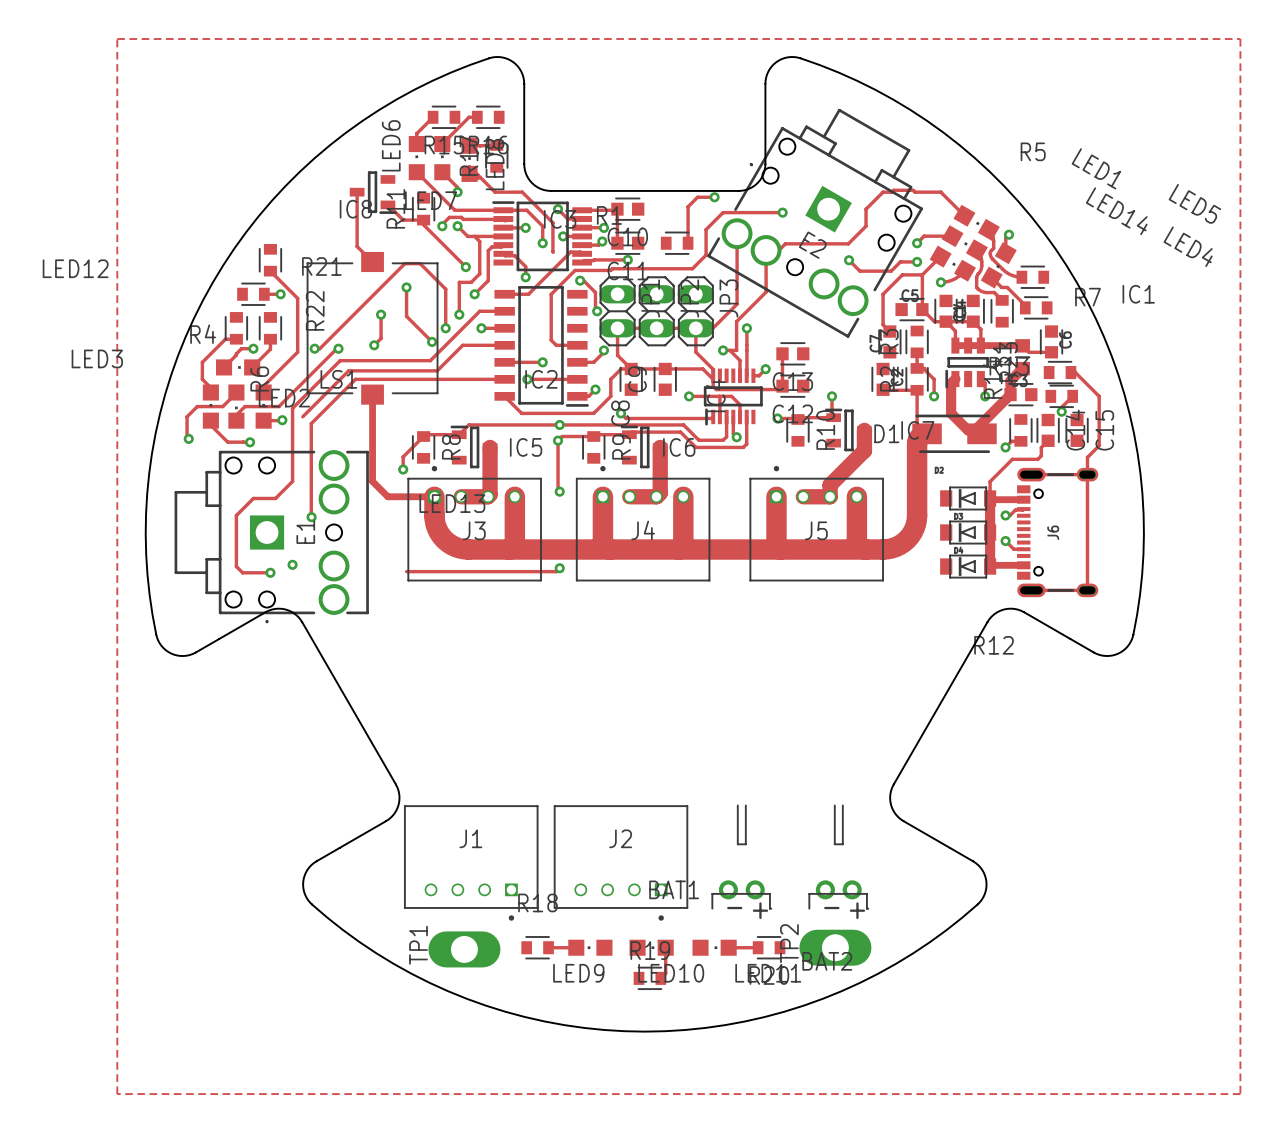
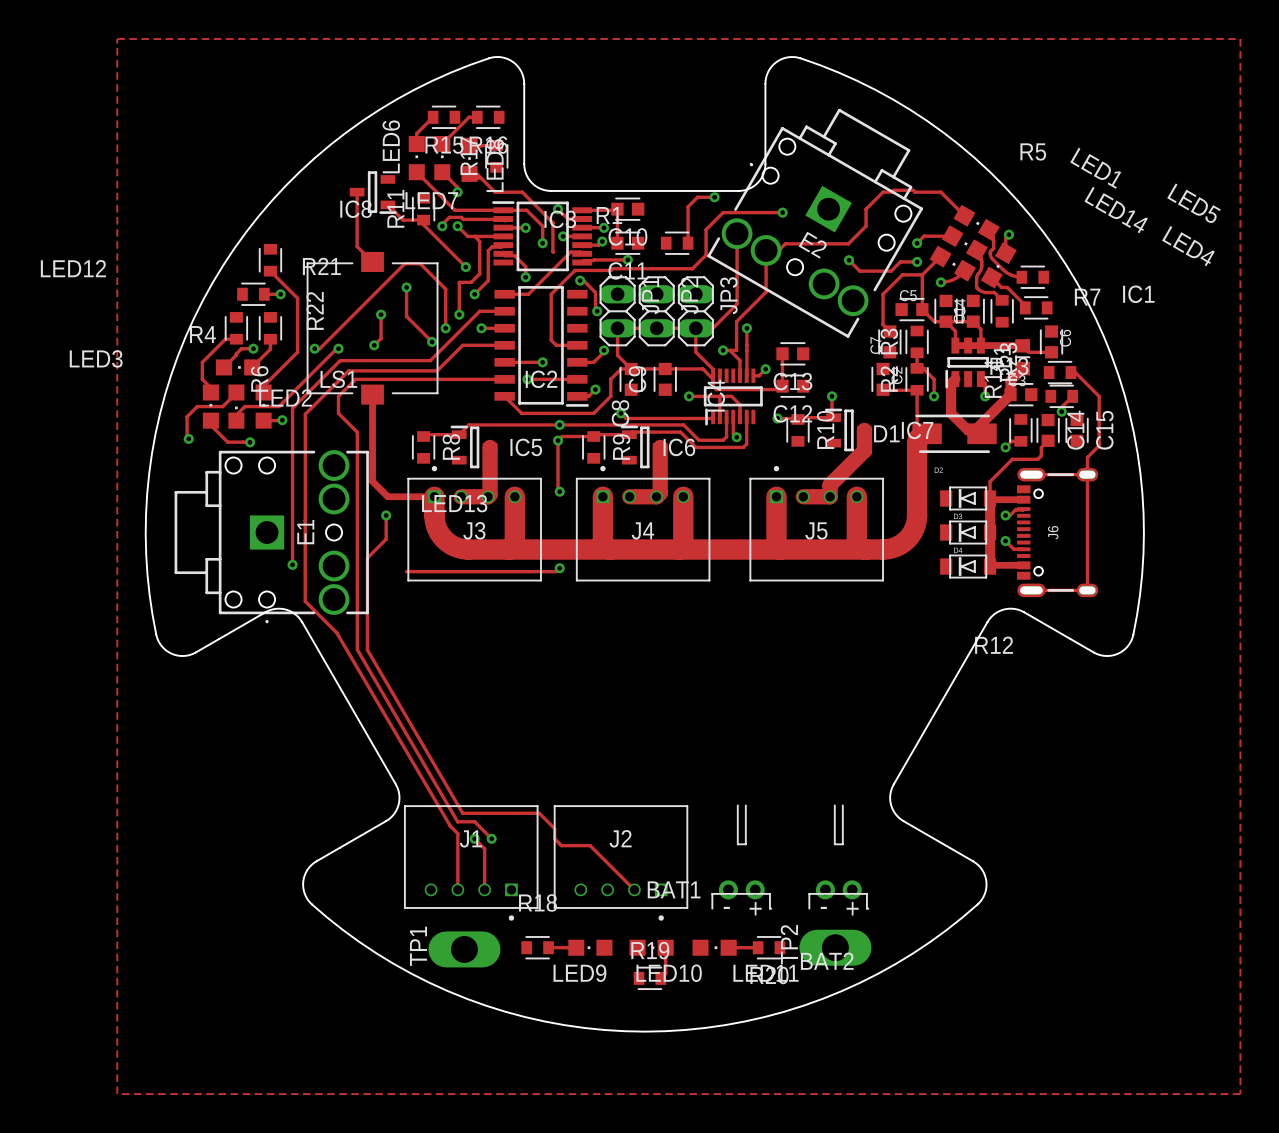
track: (338, 396) (311, 423) (311, 517) -> (338, 396) (338, 413) (357, 432) (357, 649) (457, 821) (474, 821) (491, 838)
track: (305, 414) (302, 416) -> (305, 414) (305, 601) (336, 632) (450, 826)
track: (423, 436) (403, 456) (403, 469) -> none
via: (403, 469) -> none
track: (292, 481) (275, 498) (253, 498) (236, 515) (236, 566) (242, 572) (270, 572) -> (292, 481) (292, 562)
track: none -> (386, 515) (386, 539) (367, 558) (367, 649) (462, 813) (539, 813) (554, 828) (554, 838) (561, 845) (590, 845) (634, 889)
via: none -> (386, 515)
via: (311, 517) -> none
via: (270, 572) -> none
track: none -> (450, 826) (457, 833) (457, 889)
track: none -> (474, 838) (484, 848) (484, 889)
via: none -> (474, 838)
via: none -> (491, 838)

